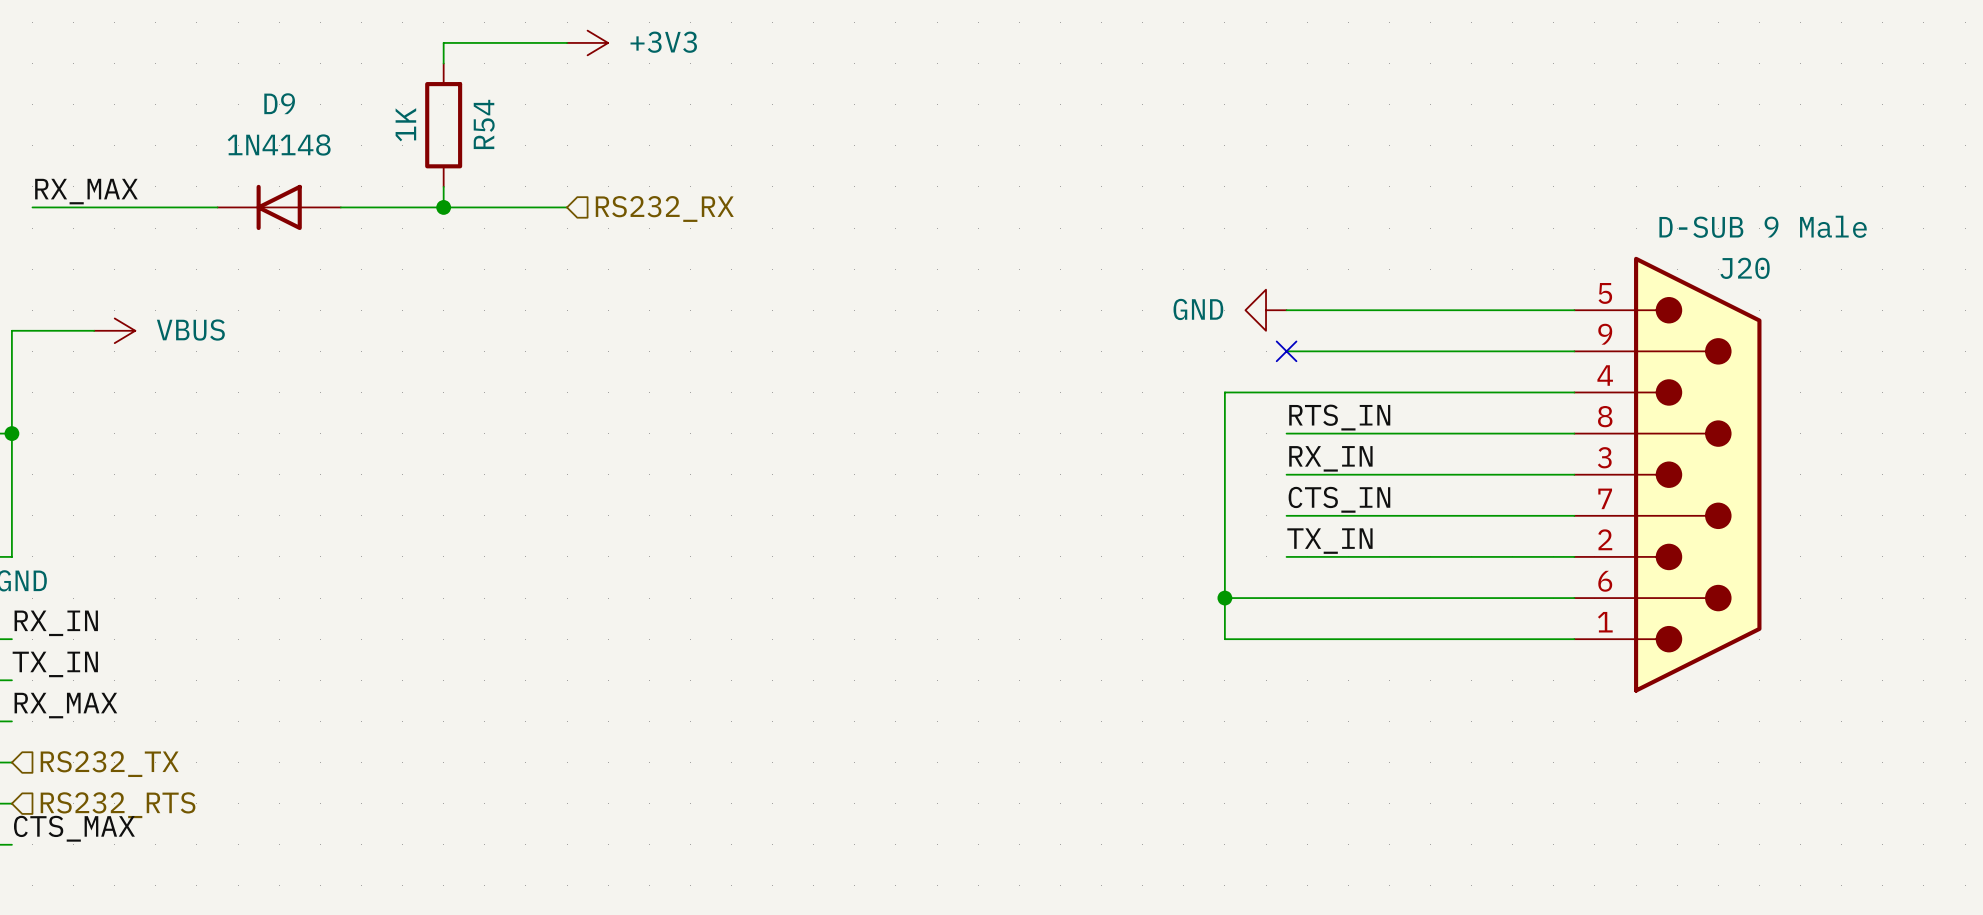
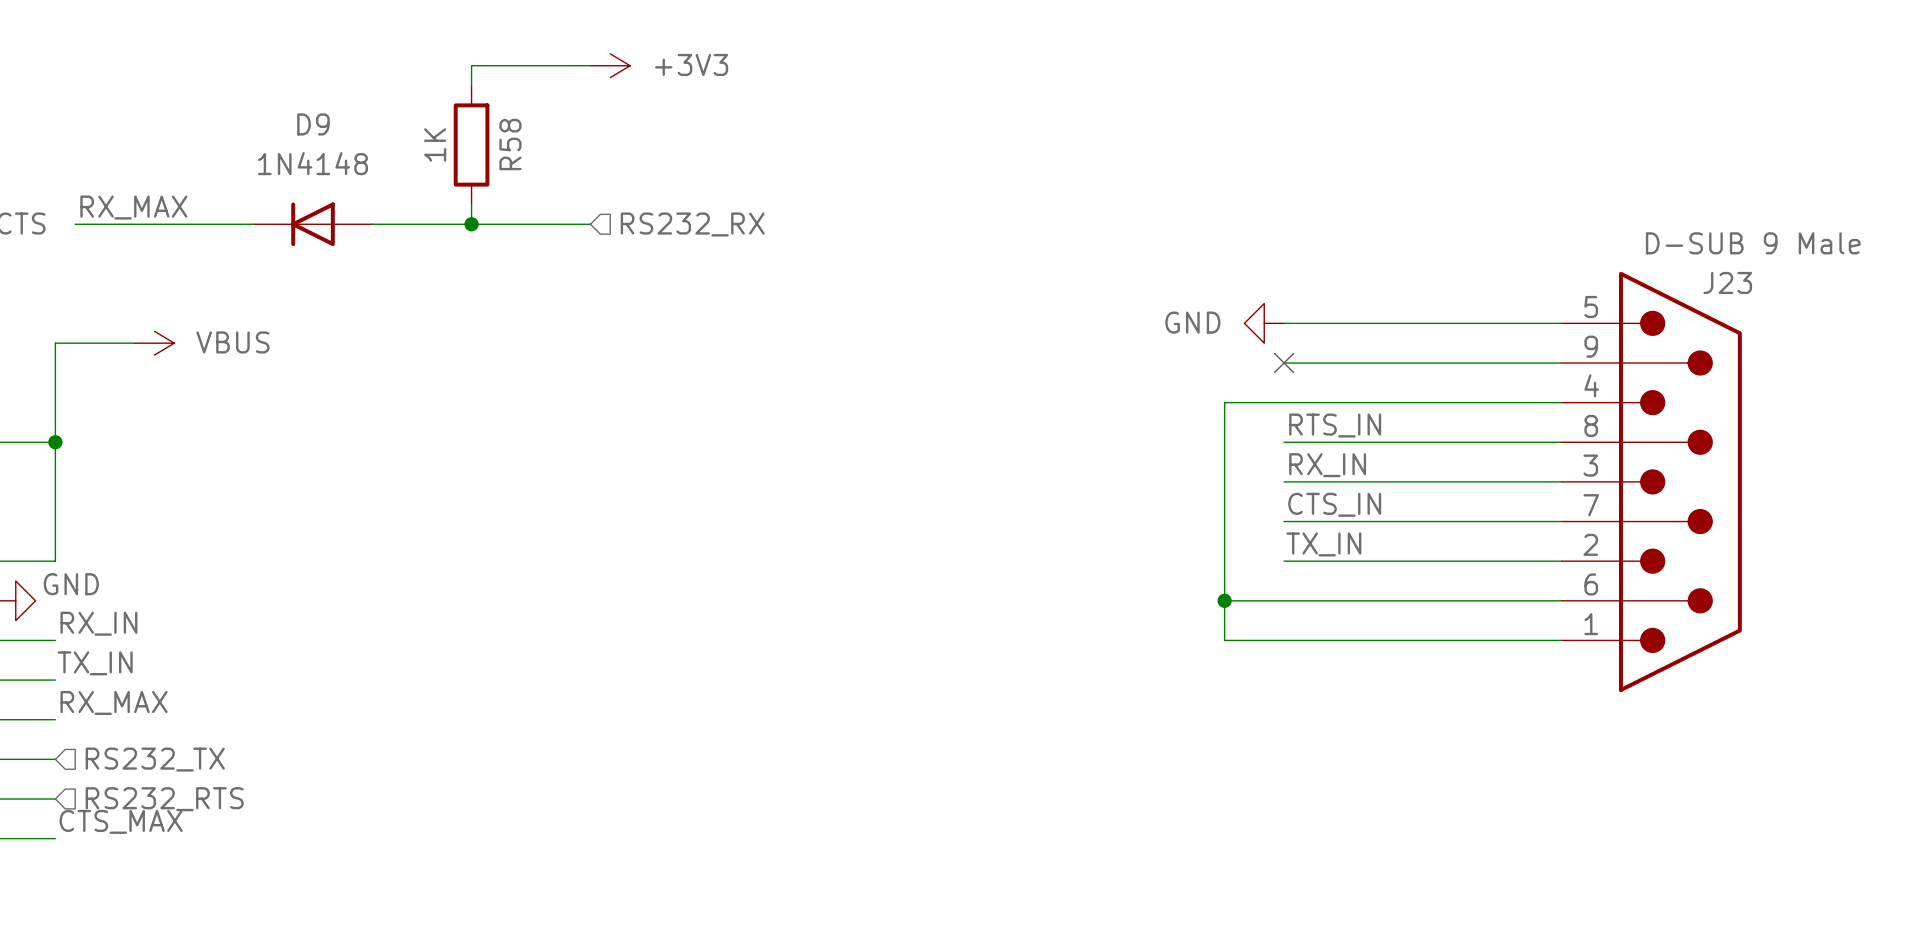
R54 name: R54 (484, 124) -> R58 (510, 144)
J20 name: J20 (1745, 268) -> J23 (1727, 282)

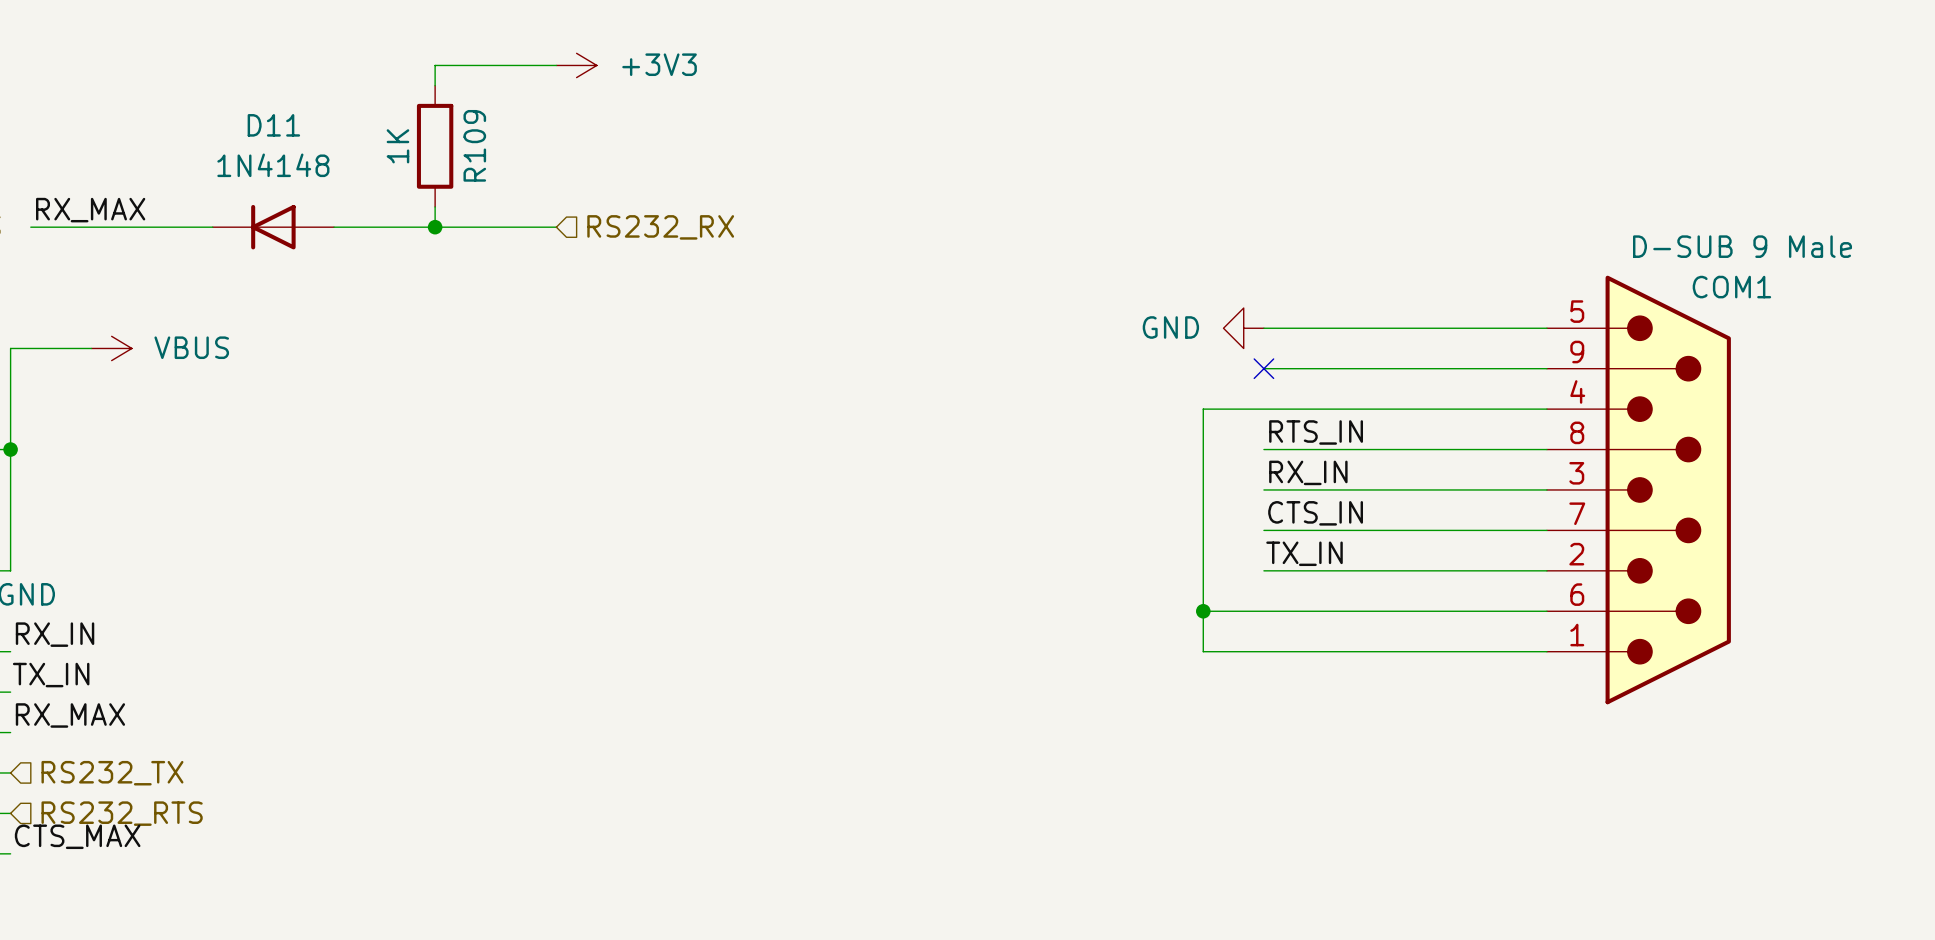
D9 name: D9 (313, 124) -> D11 (273, 125)
R58 name: R58 (510, 144) -> R109 (474, 145)
J23 name: J23 (1727, 282) -> COM1 (1731, 287)

